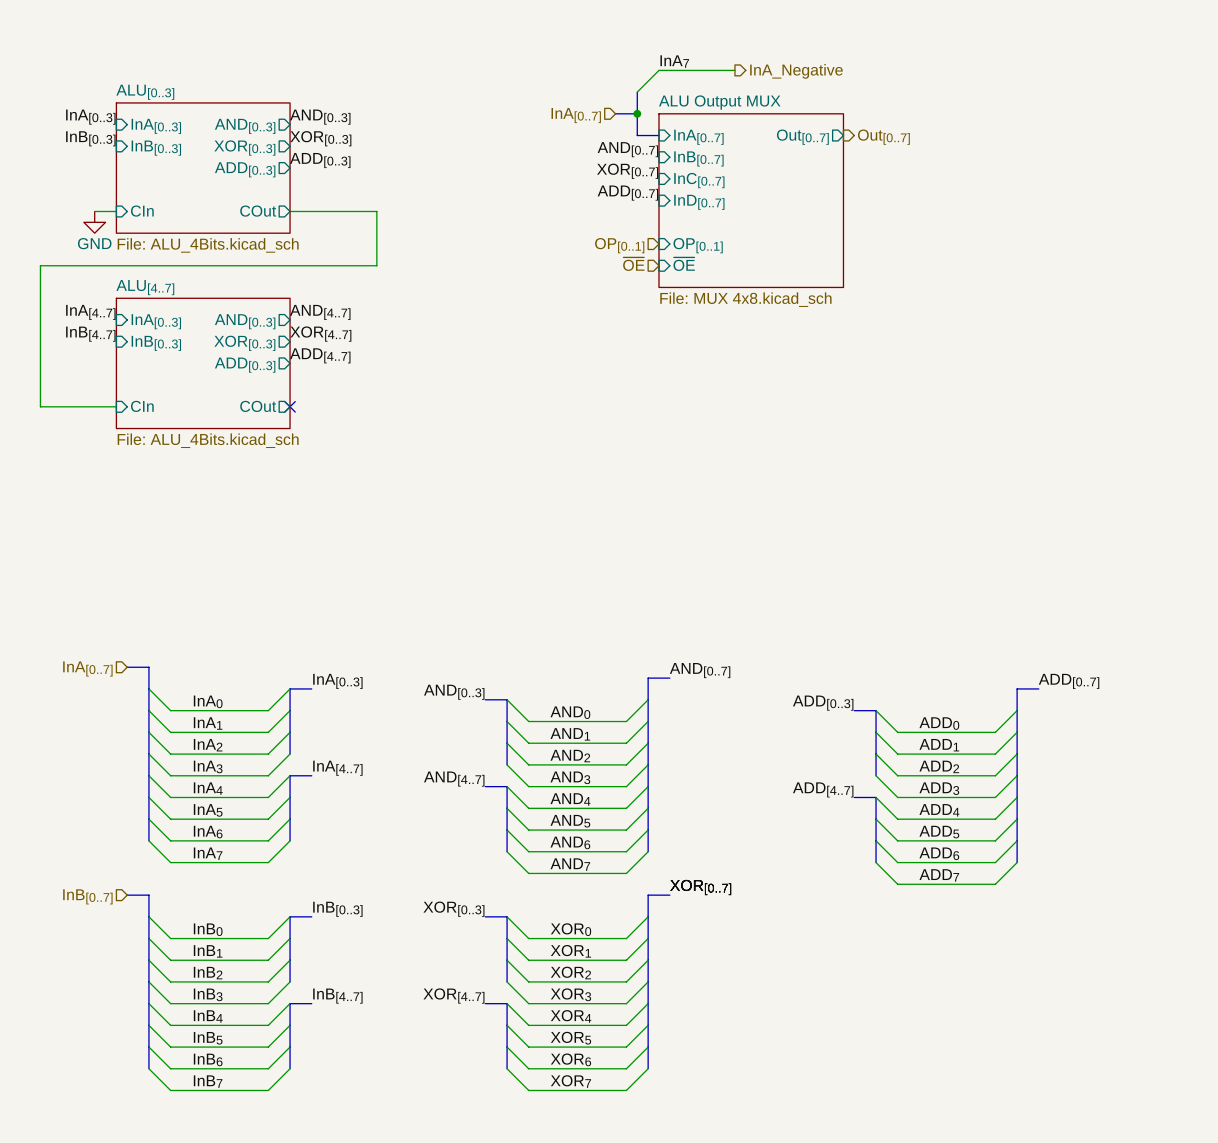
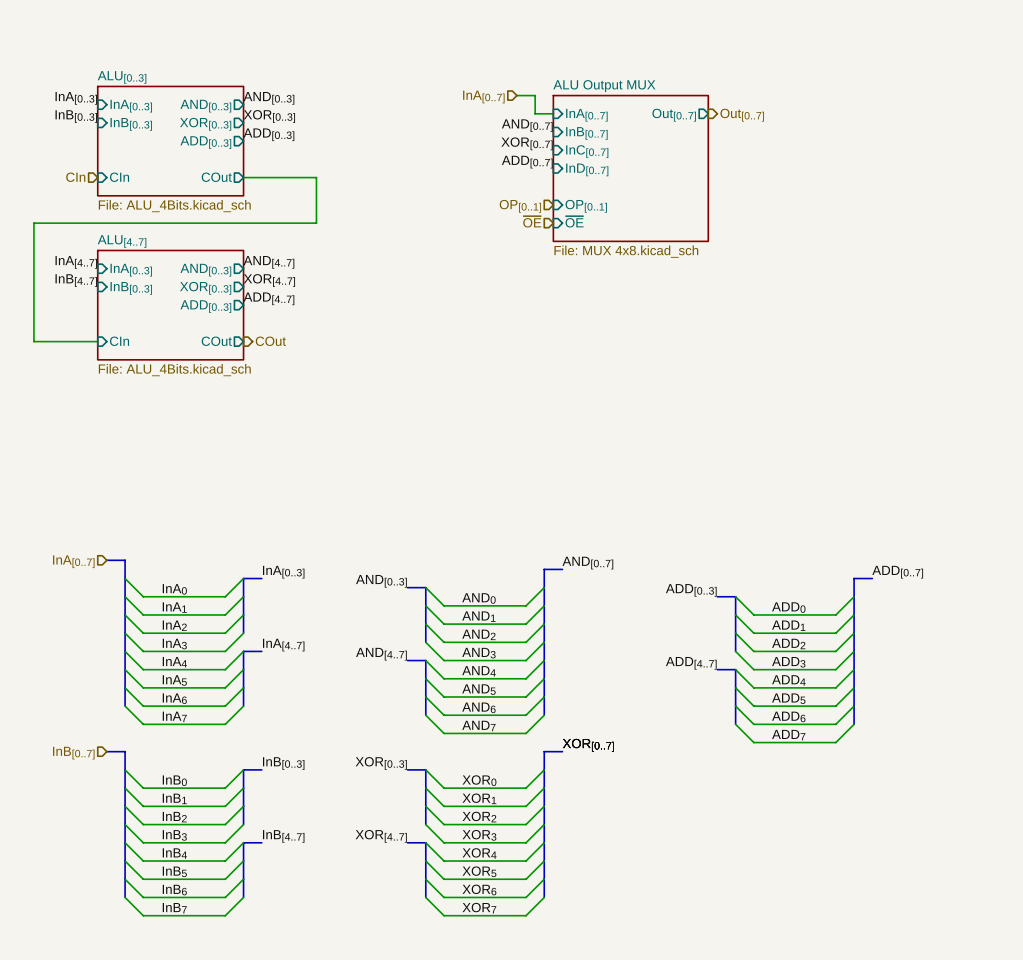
label: InA7 (674, 61) -> none
wire: (734, 70) (658, 70) (637, 92) -> none
hierarchical label: InA_Negative (796, 71) -> none
bus: (637, 92) (637, 135) (658, 135) -> none
bus: (615, 113) (637, 113) -> none
junction: (637, 113) -> none
hierarchical label: none -> CIn (75, 177)
wire: (94, 211) (116, 211) -> none
power symbol: GND (94, 222) -> none
no-connect mark: (290, 406) -> none
hierarchical label: none -> COut (270, 341)

